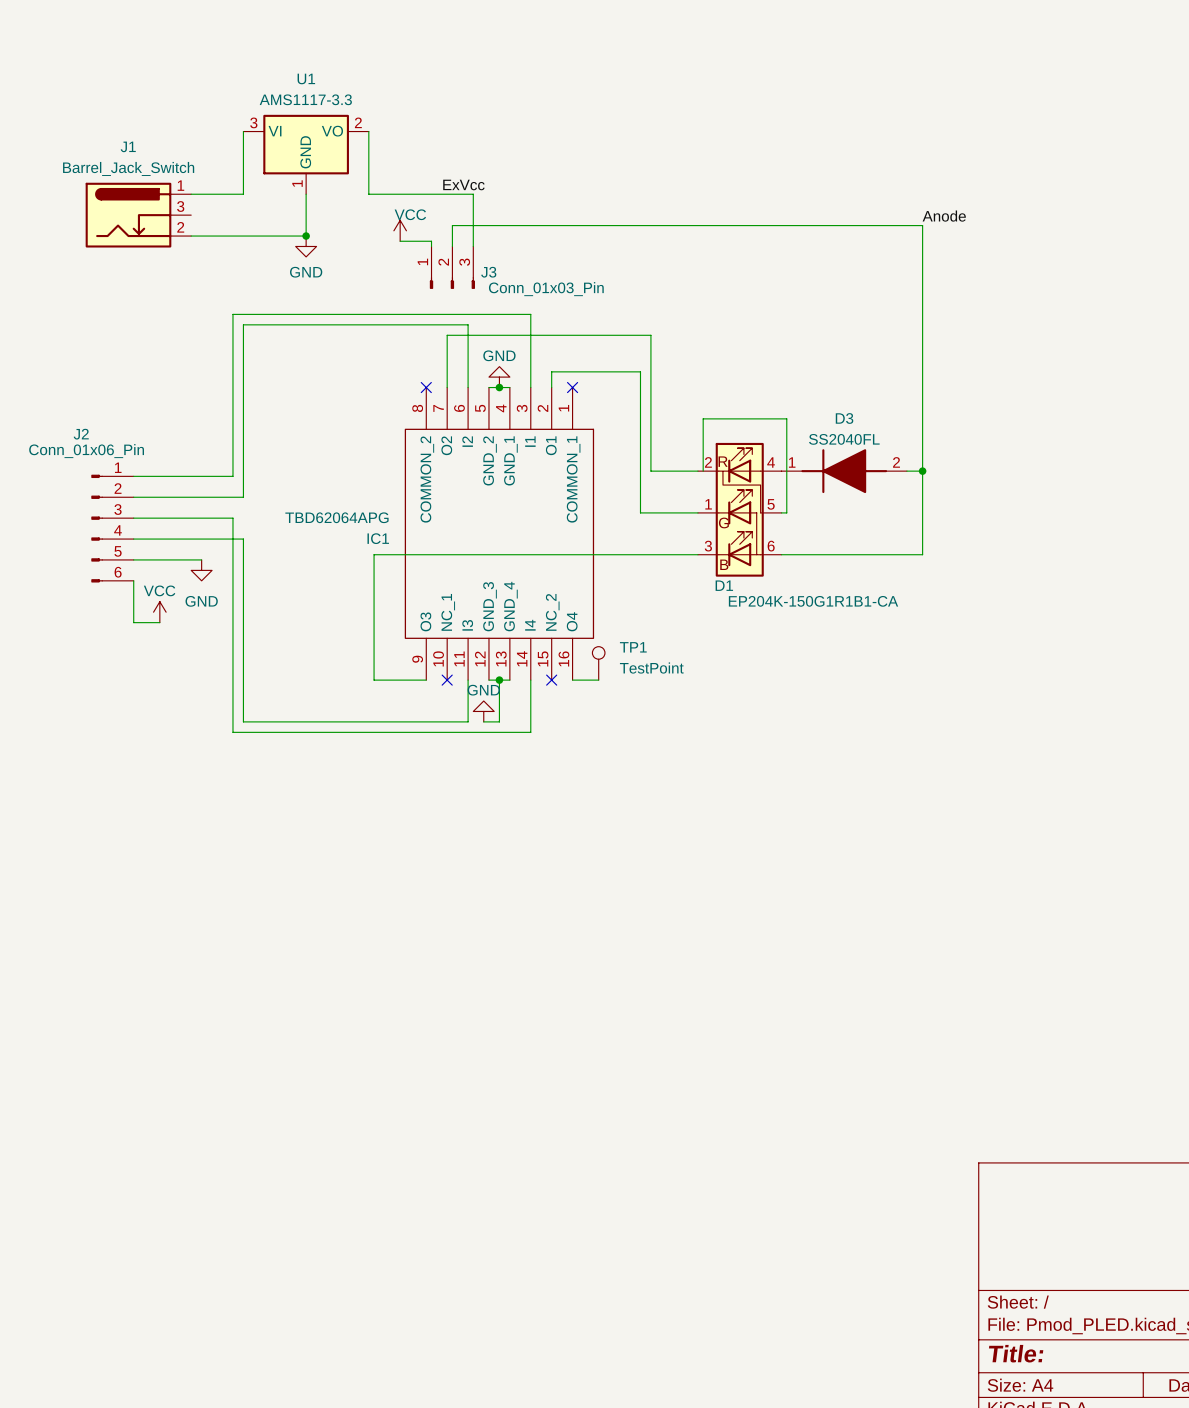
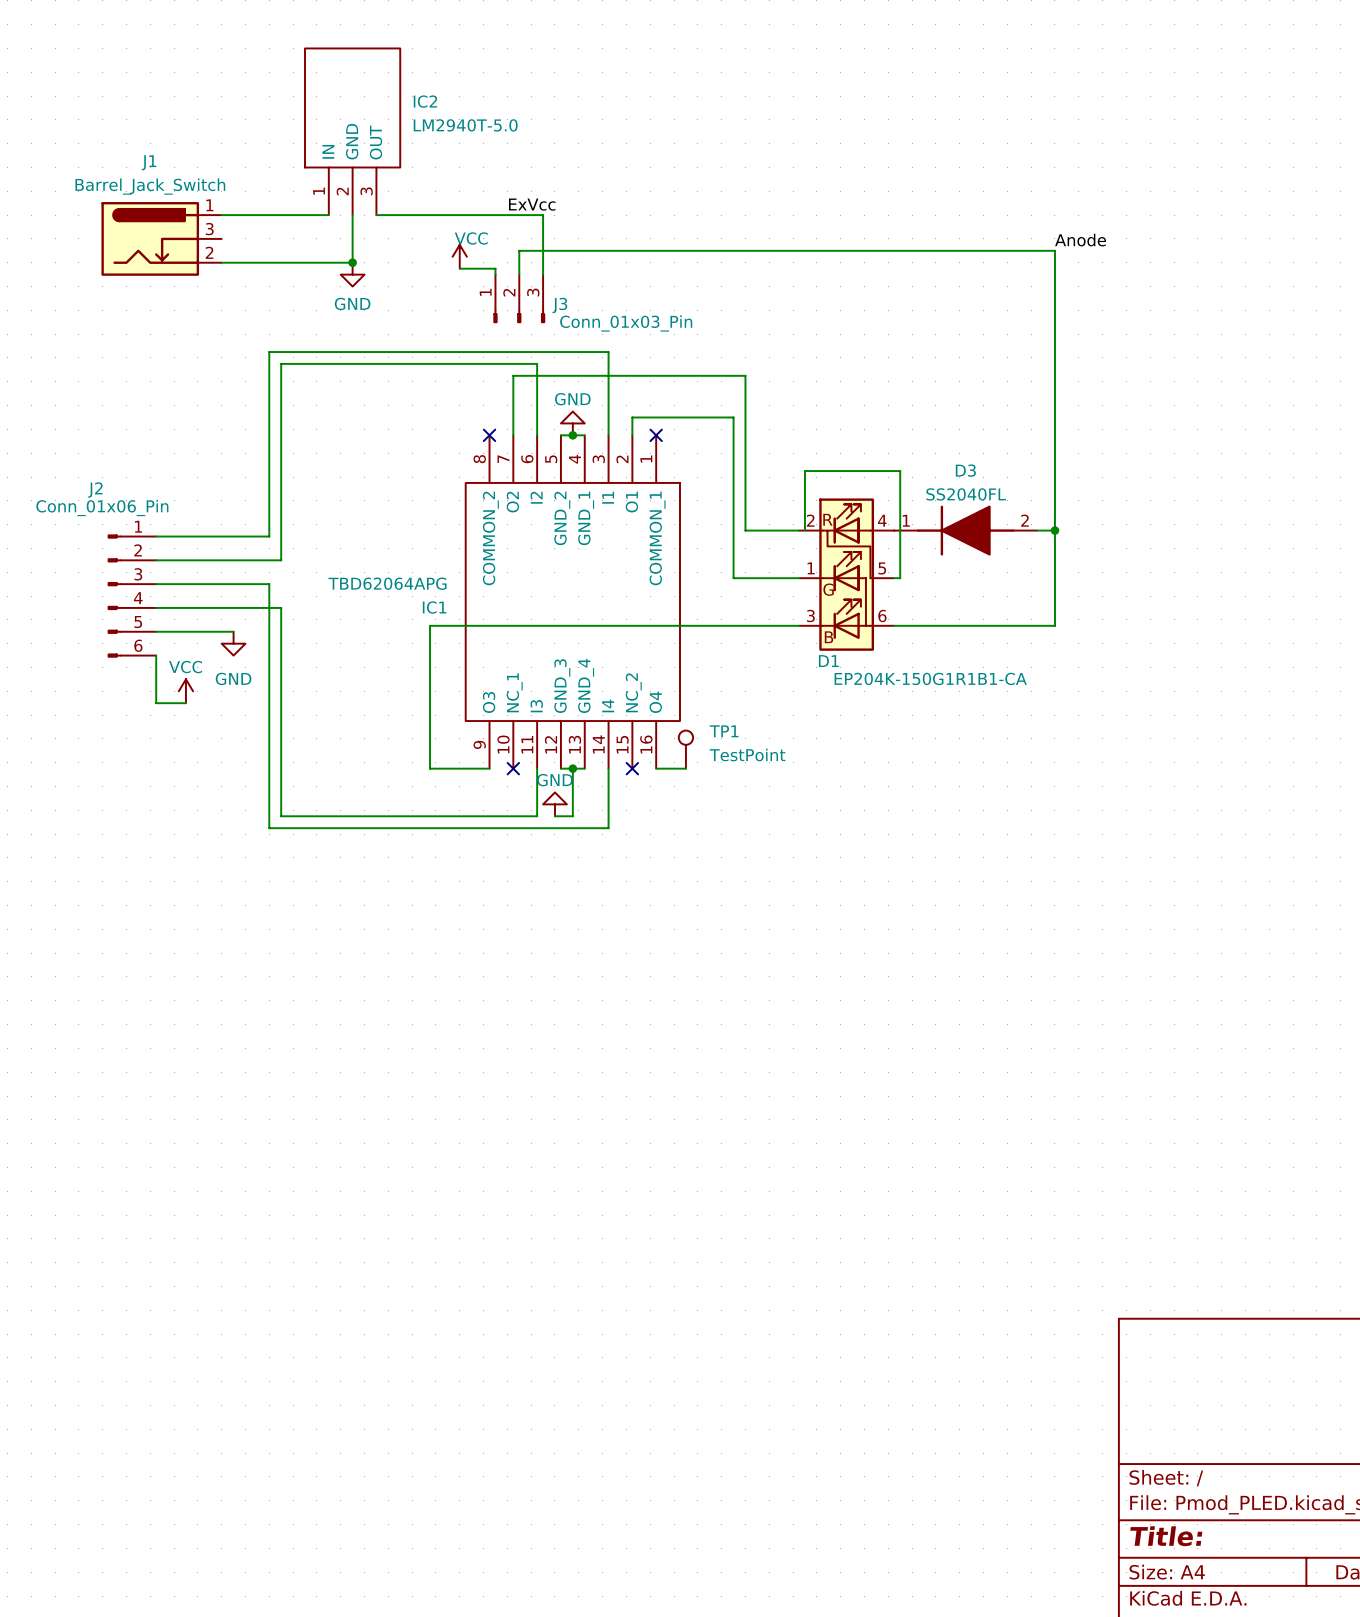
IC2: none -> LM2940T-5.0 (352, 131)
wire: (243, 131) (243, 194) -> (328, 215) (281, 215)
wire: (368, 131) (368, 194) -> (376, 215) (424, 215)
U1: AMS1117-3.3 (306, 154) -> none

